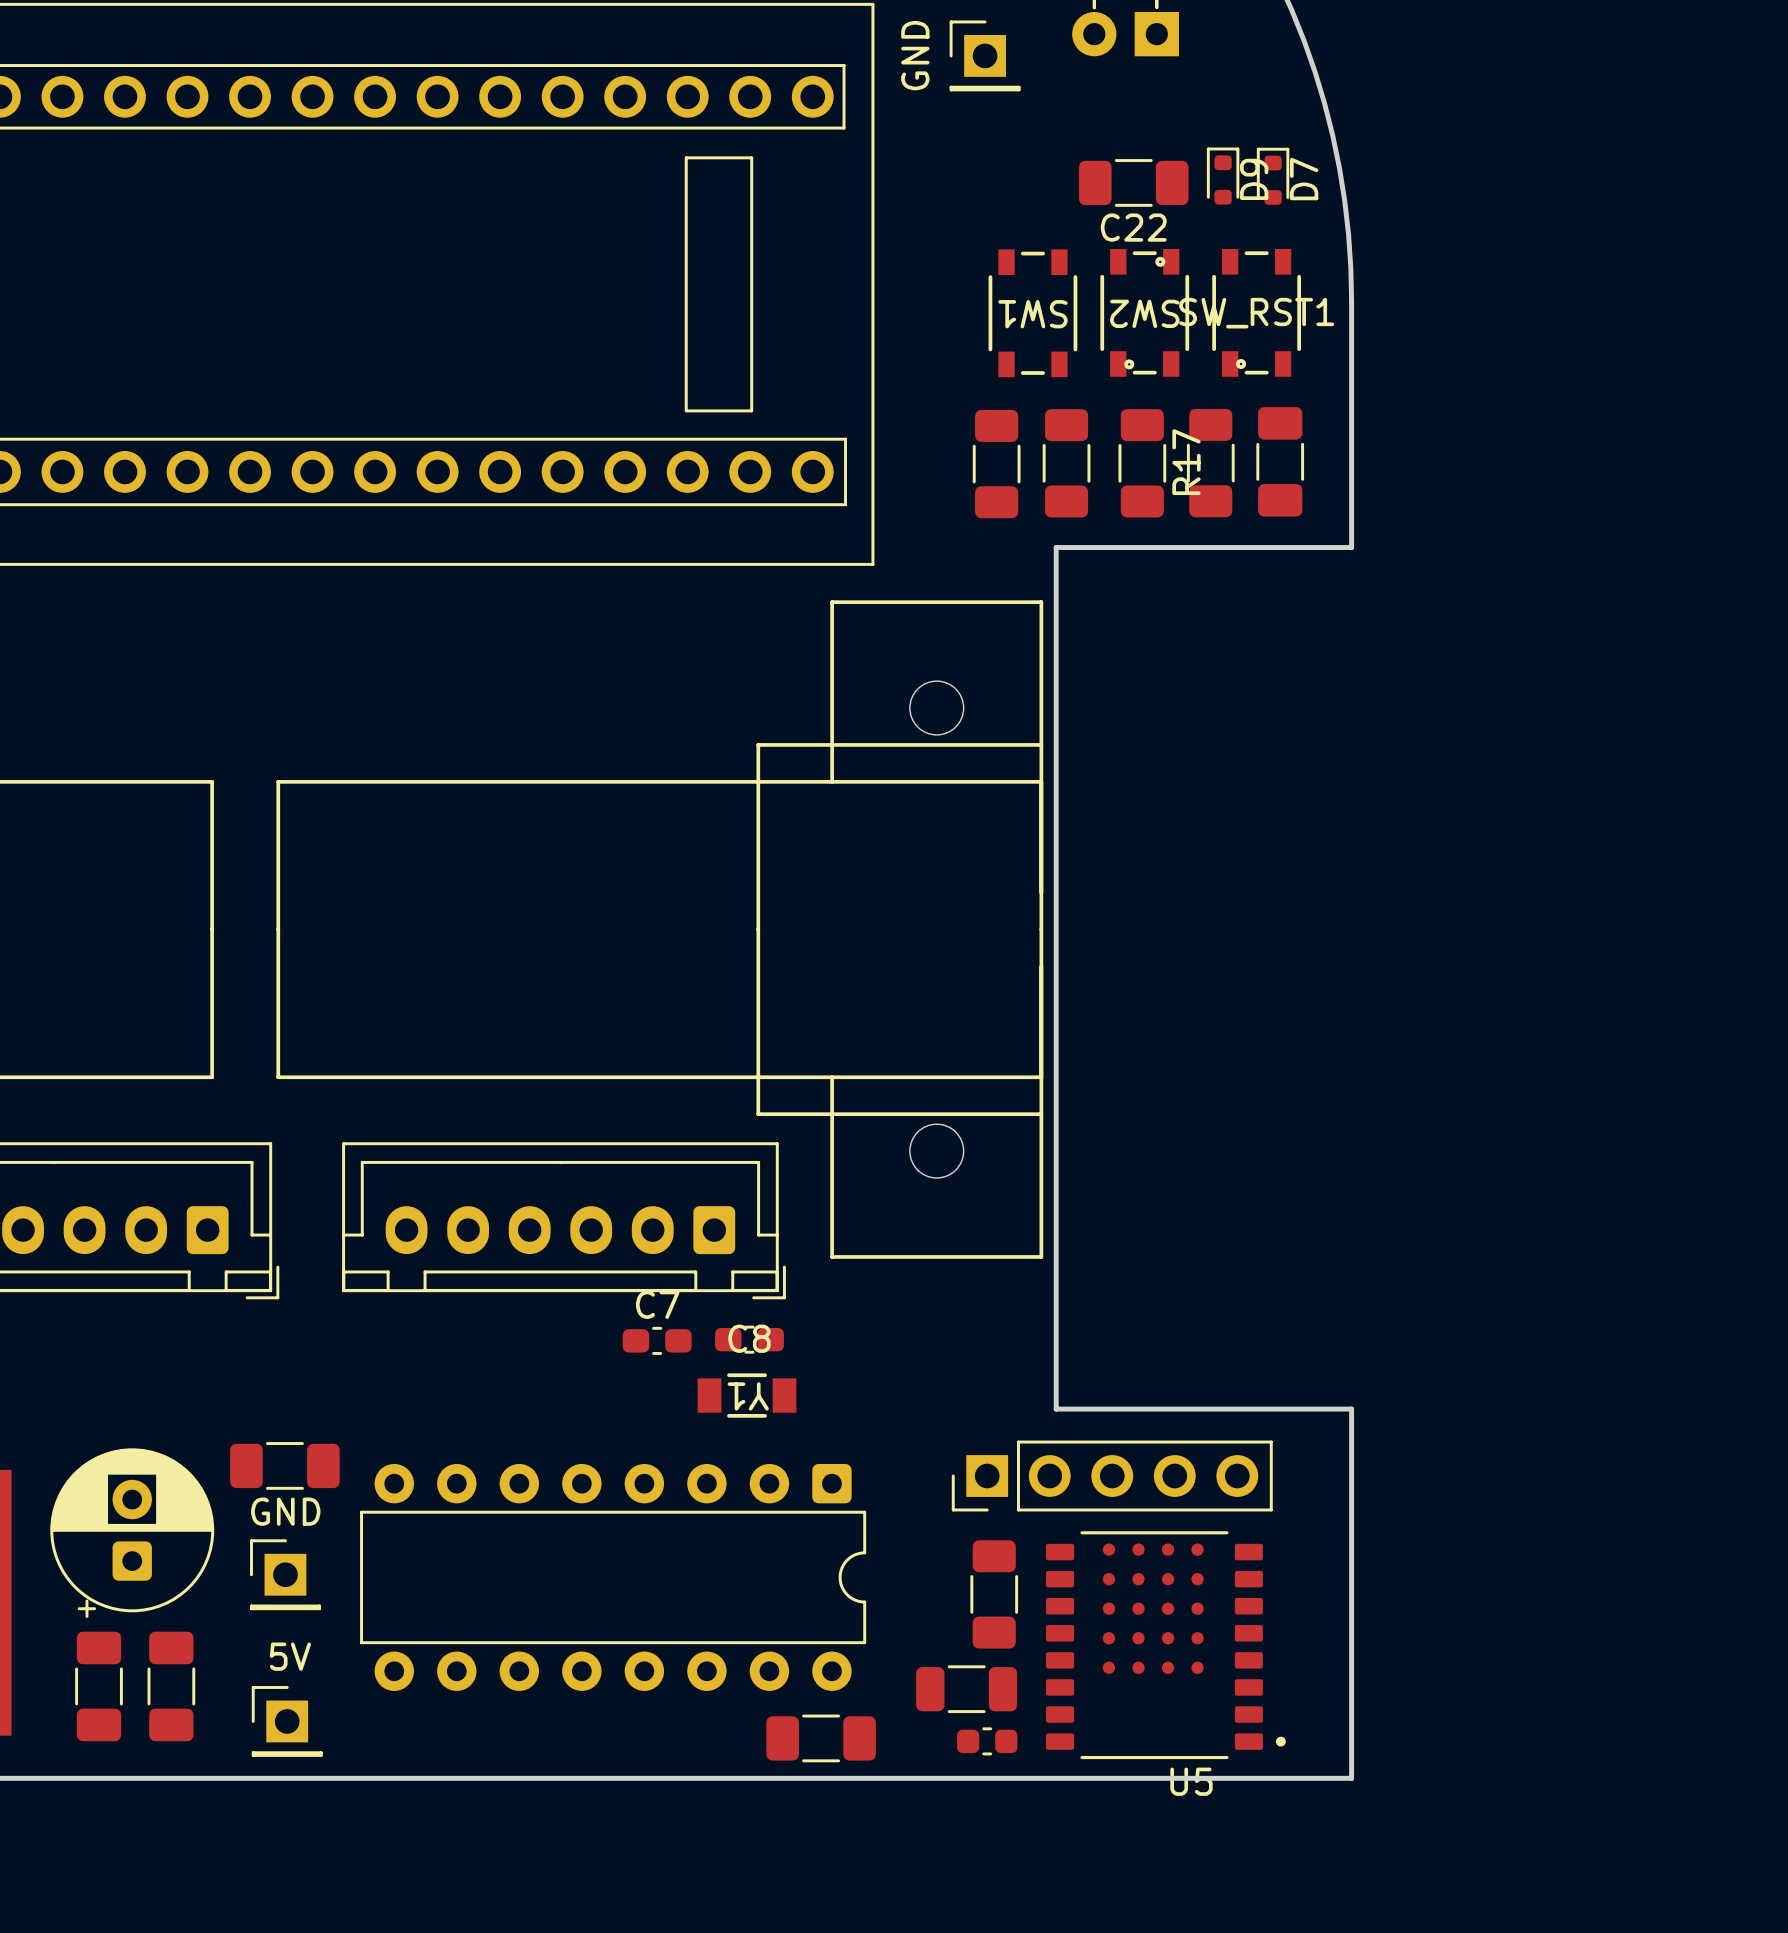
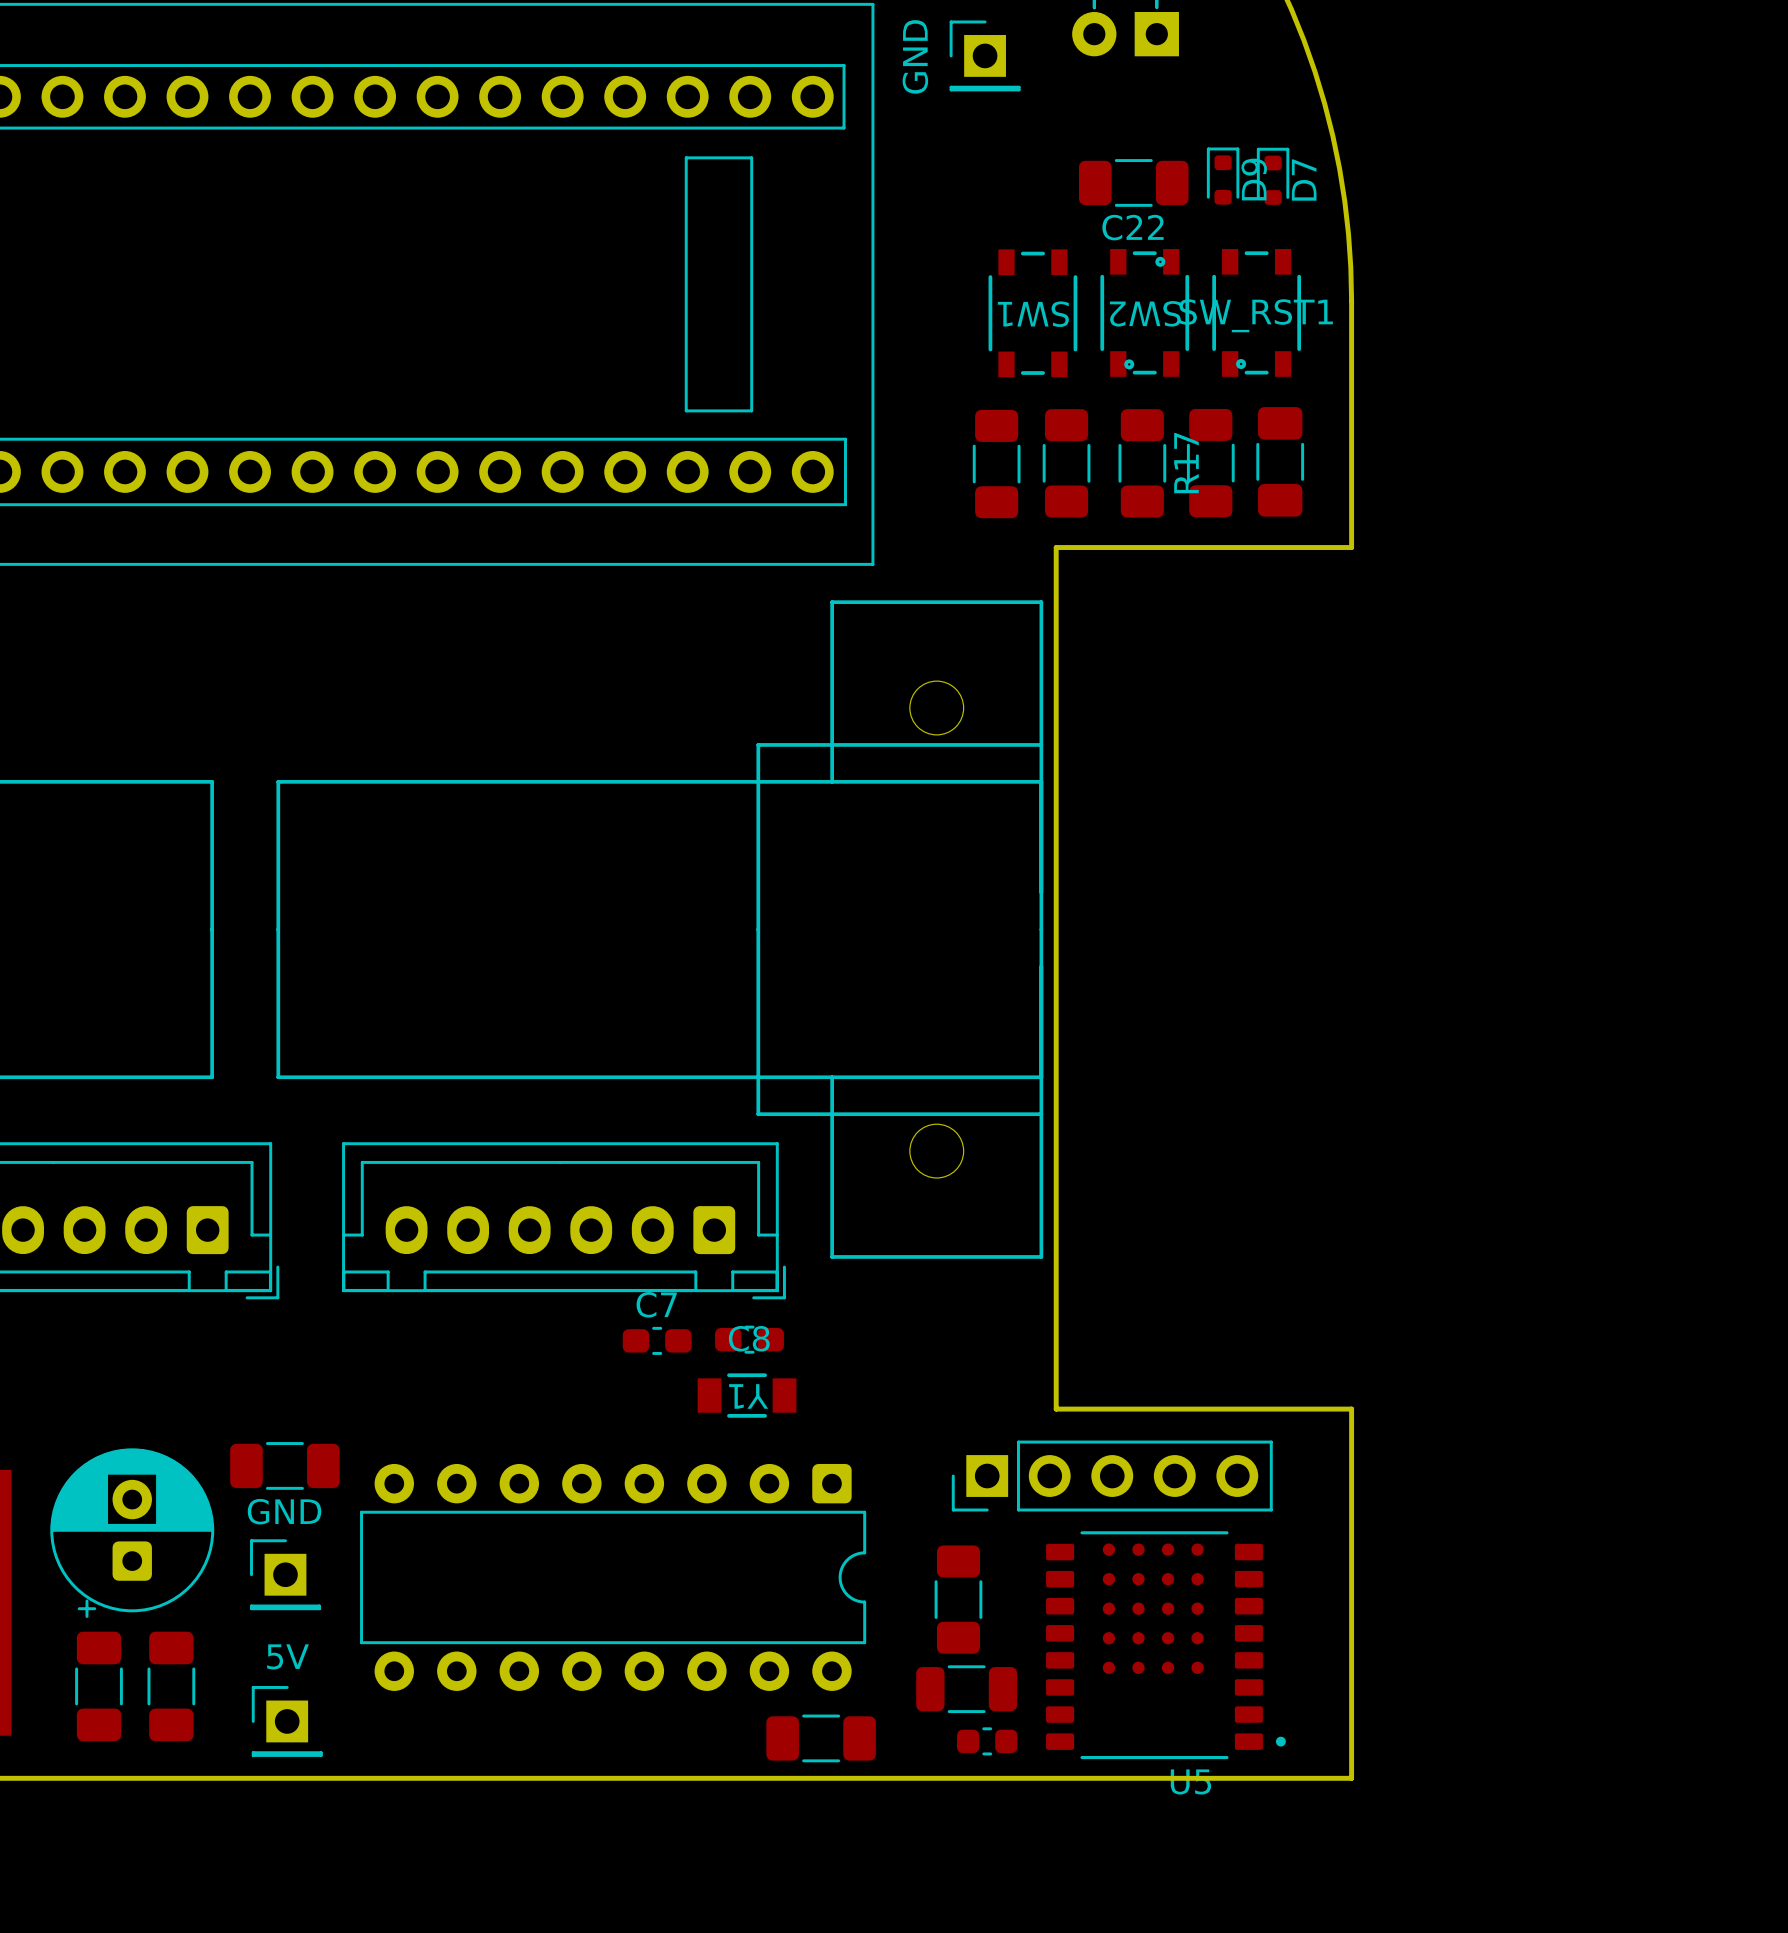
part position: (994, 1594) -> (958, 1599)

